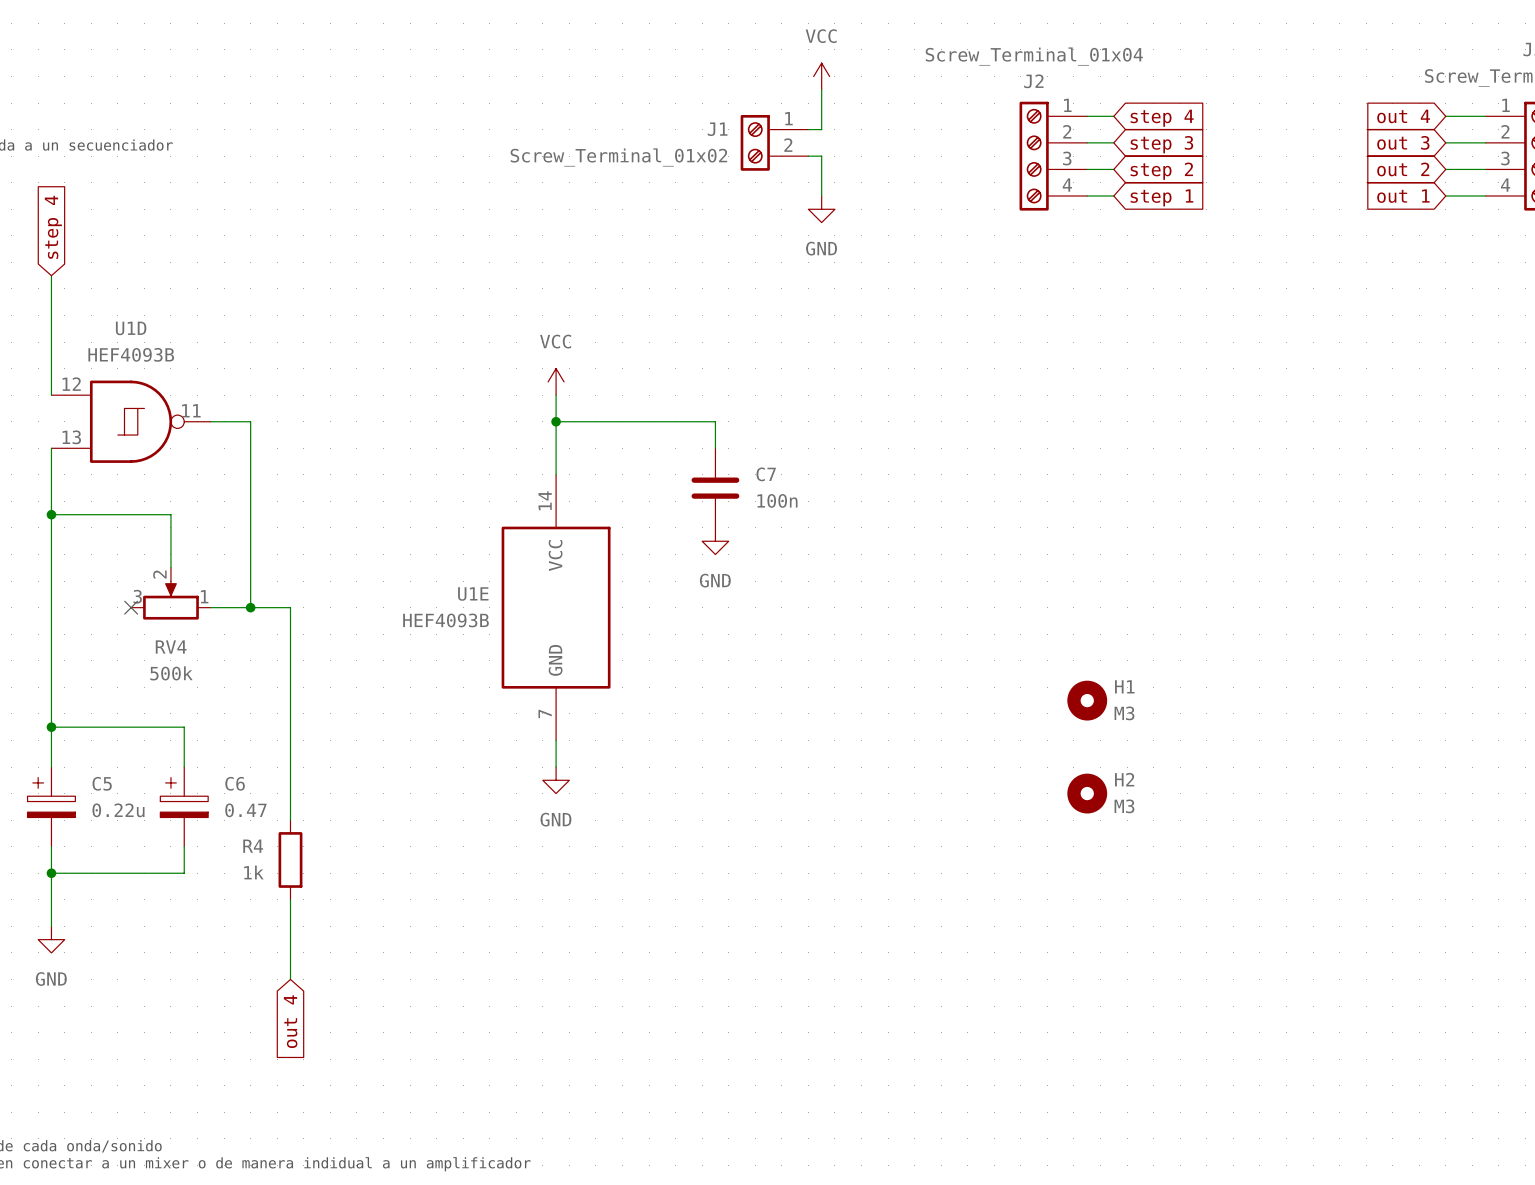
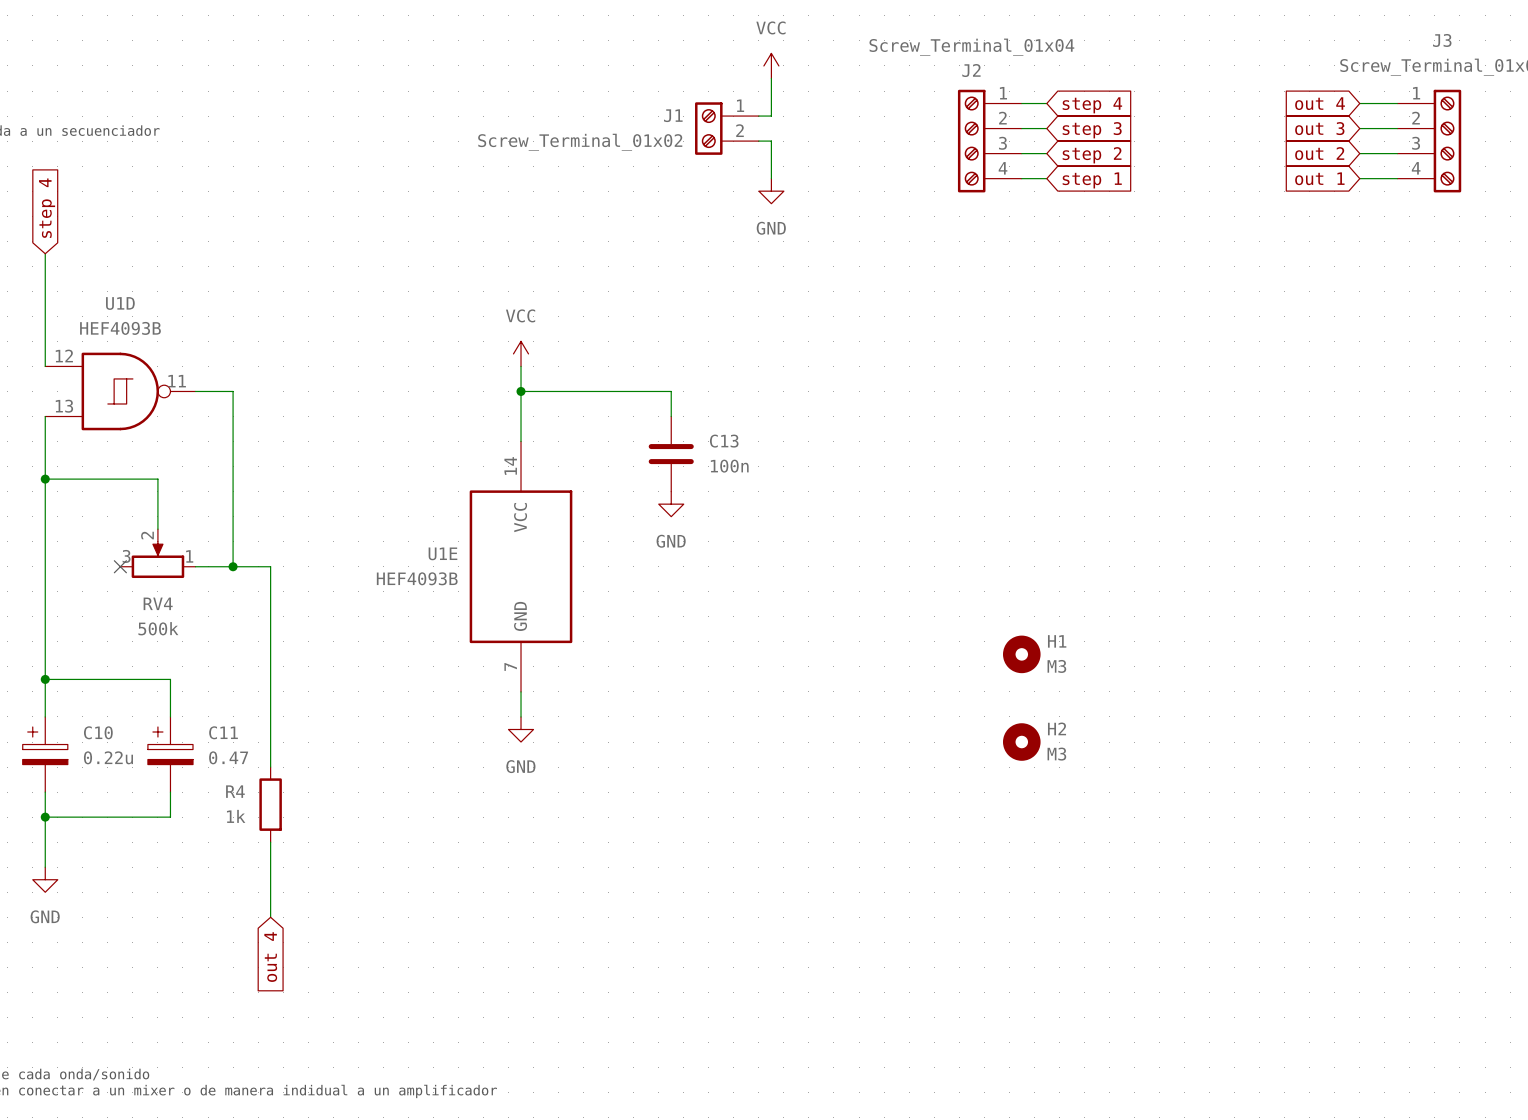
C7 name: C7 (766, 474) -> C13 (724, 441)
C5 name: C5 (102, 783) -> C10 (98, 732)
C6 name: C6 (235, 783) -> C11 (223, 732)

